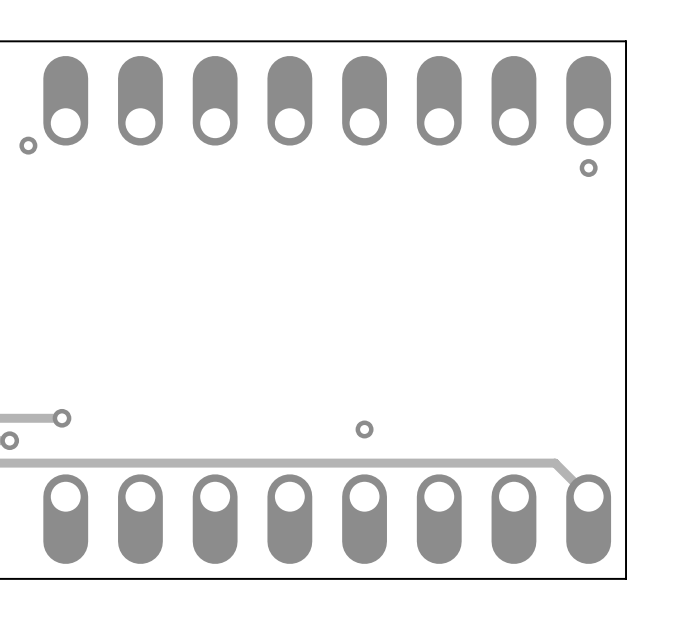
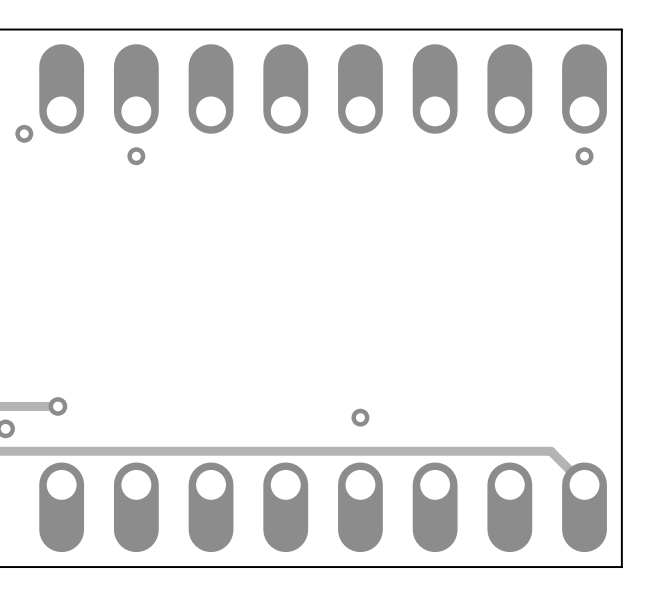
via: none -> (136, 156)

